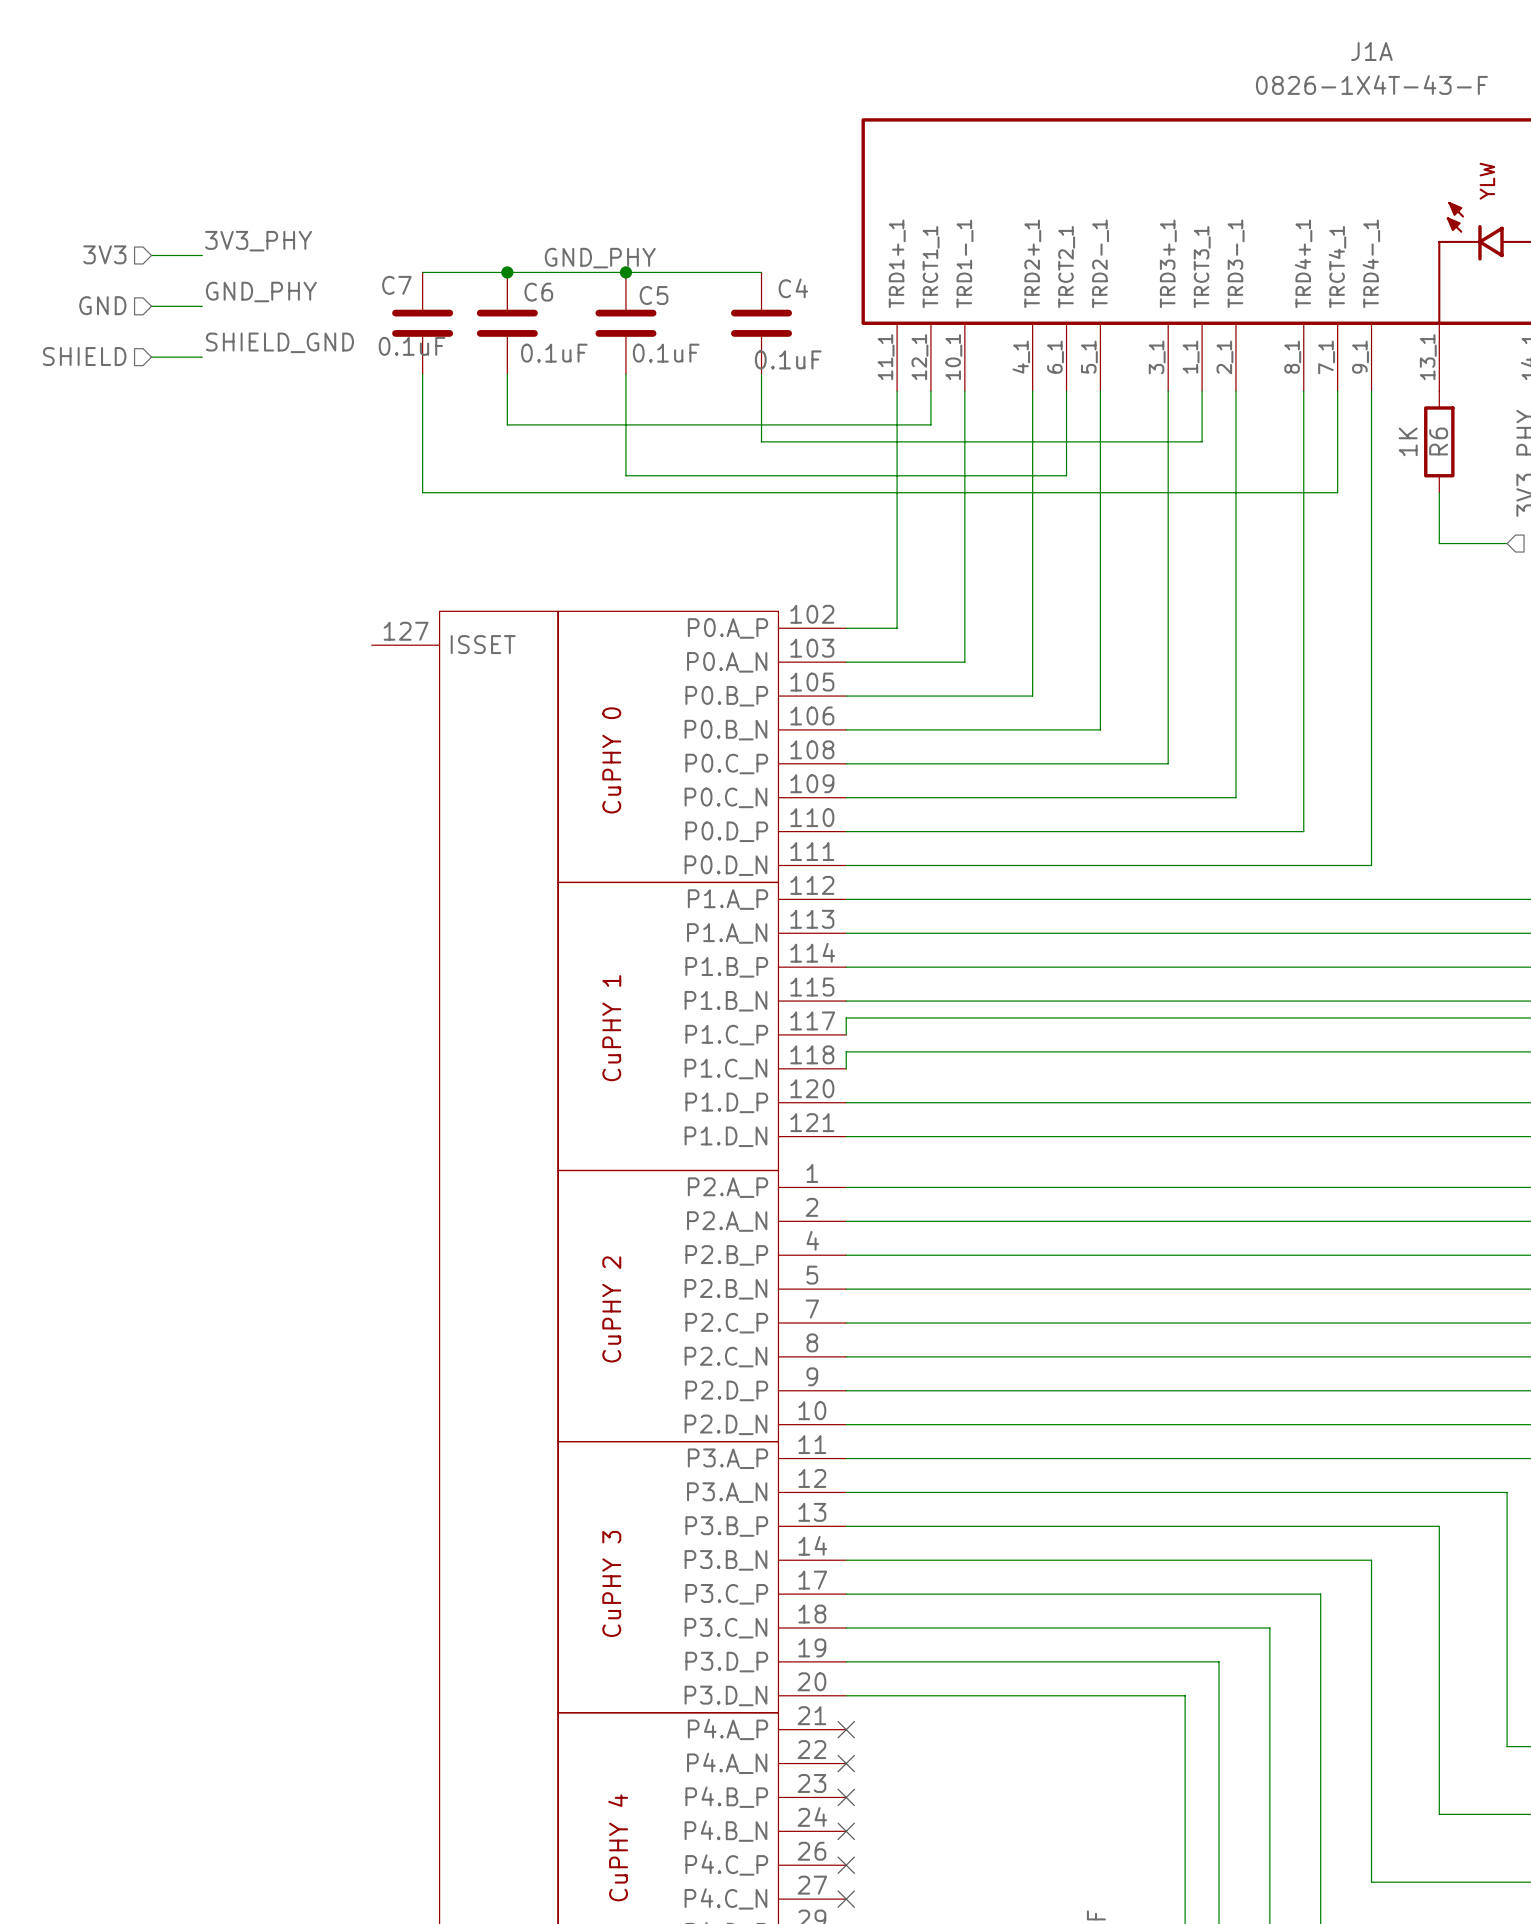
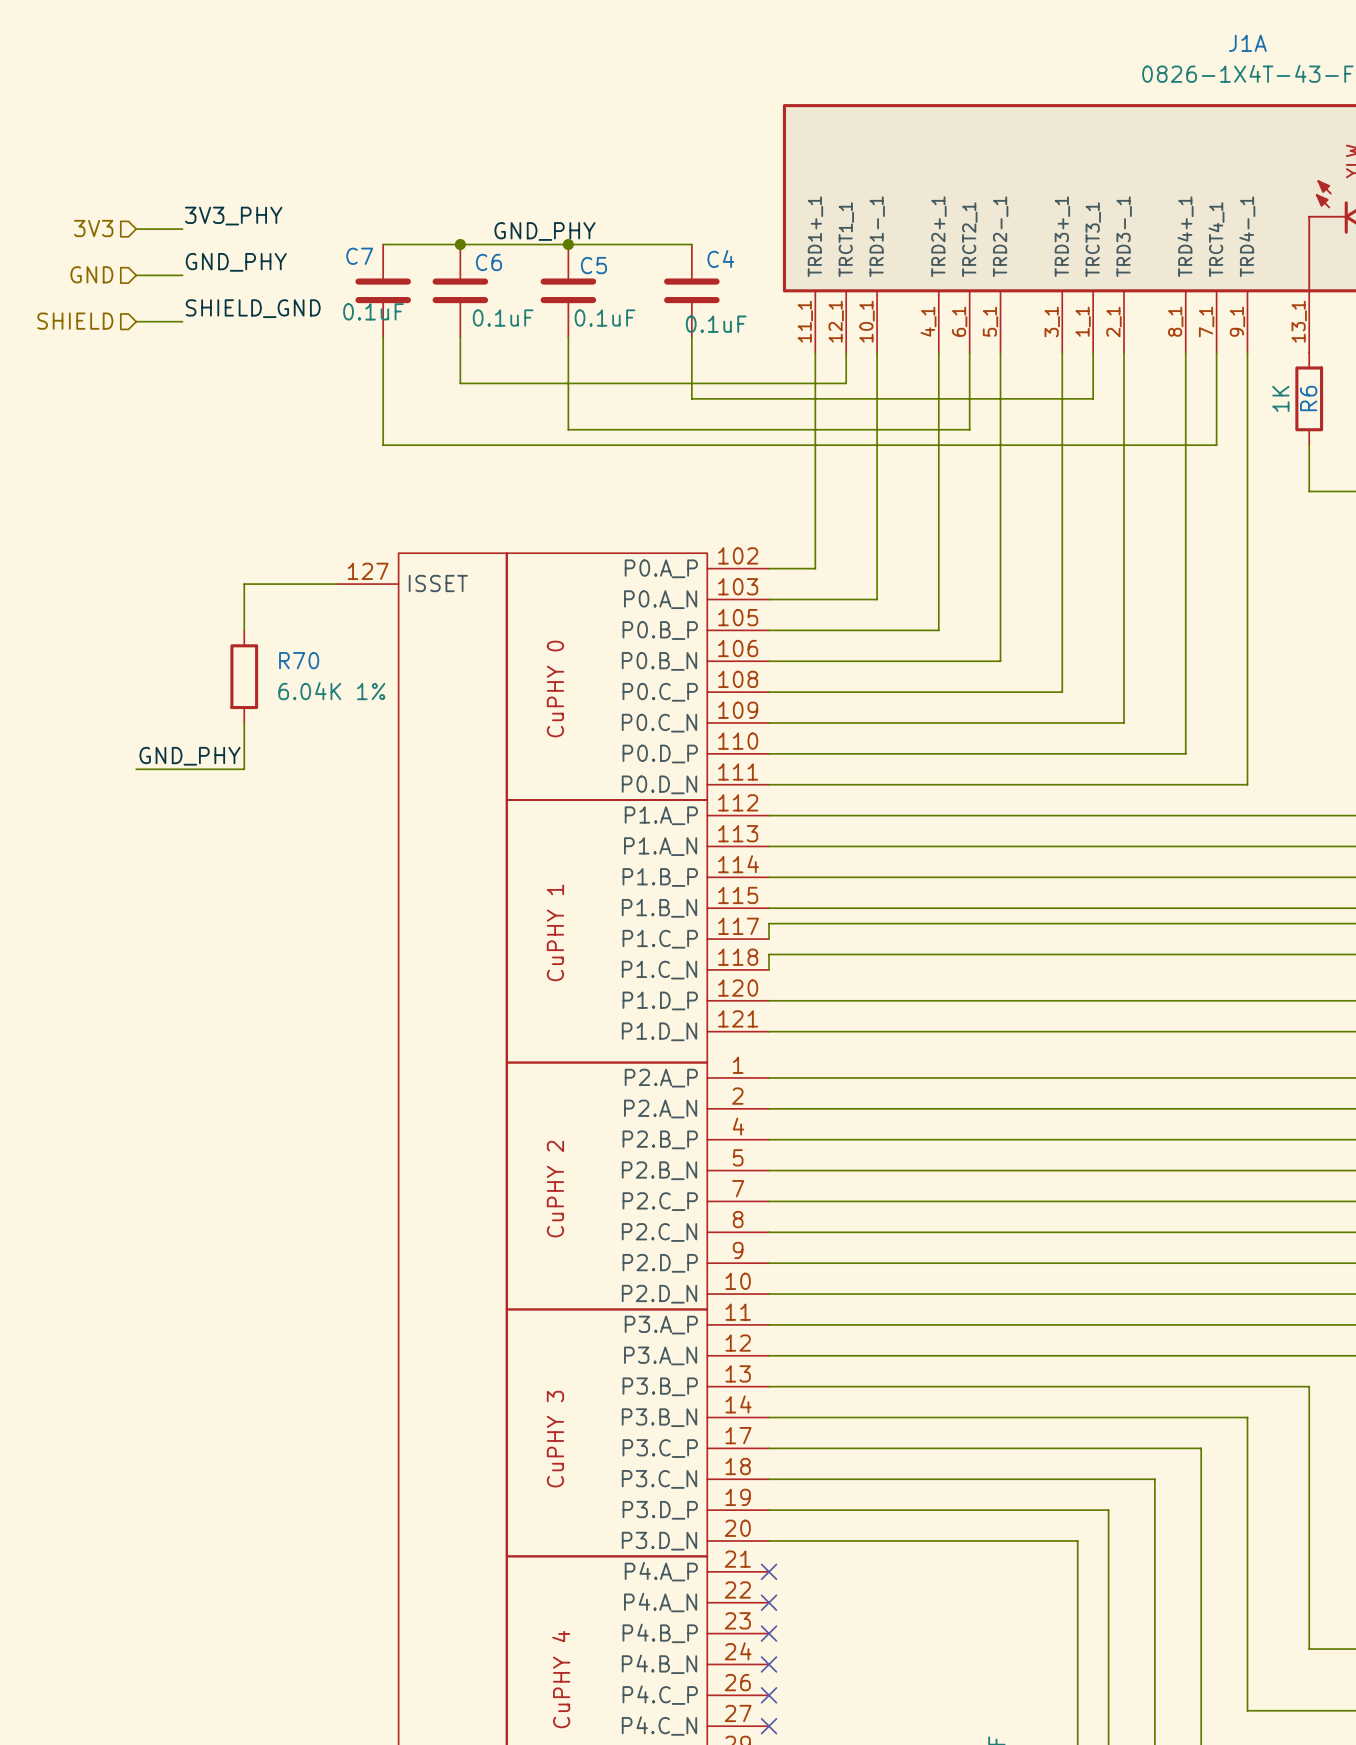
wire: none -> (336, 584) (244, 584) (244, 630)
R70: none -> 6.04K 1% (244, 676)
wire: none -> (244, 722) (244, 769) (136, 769)
label: none -> GND_PHY (189, 756)

